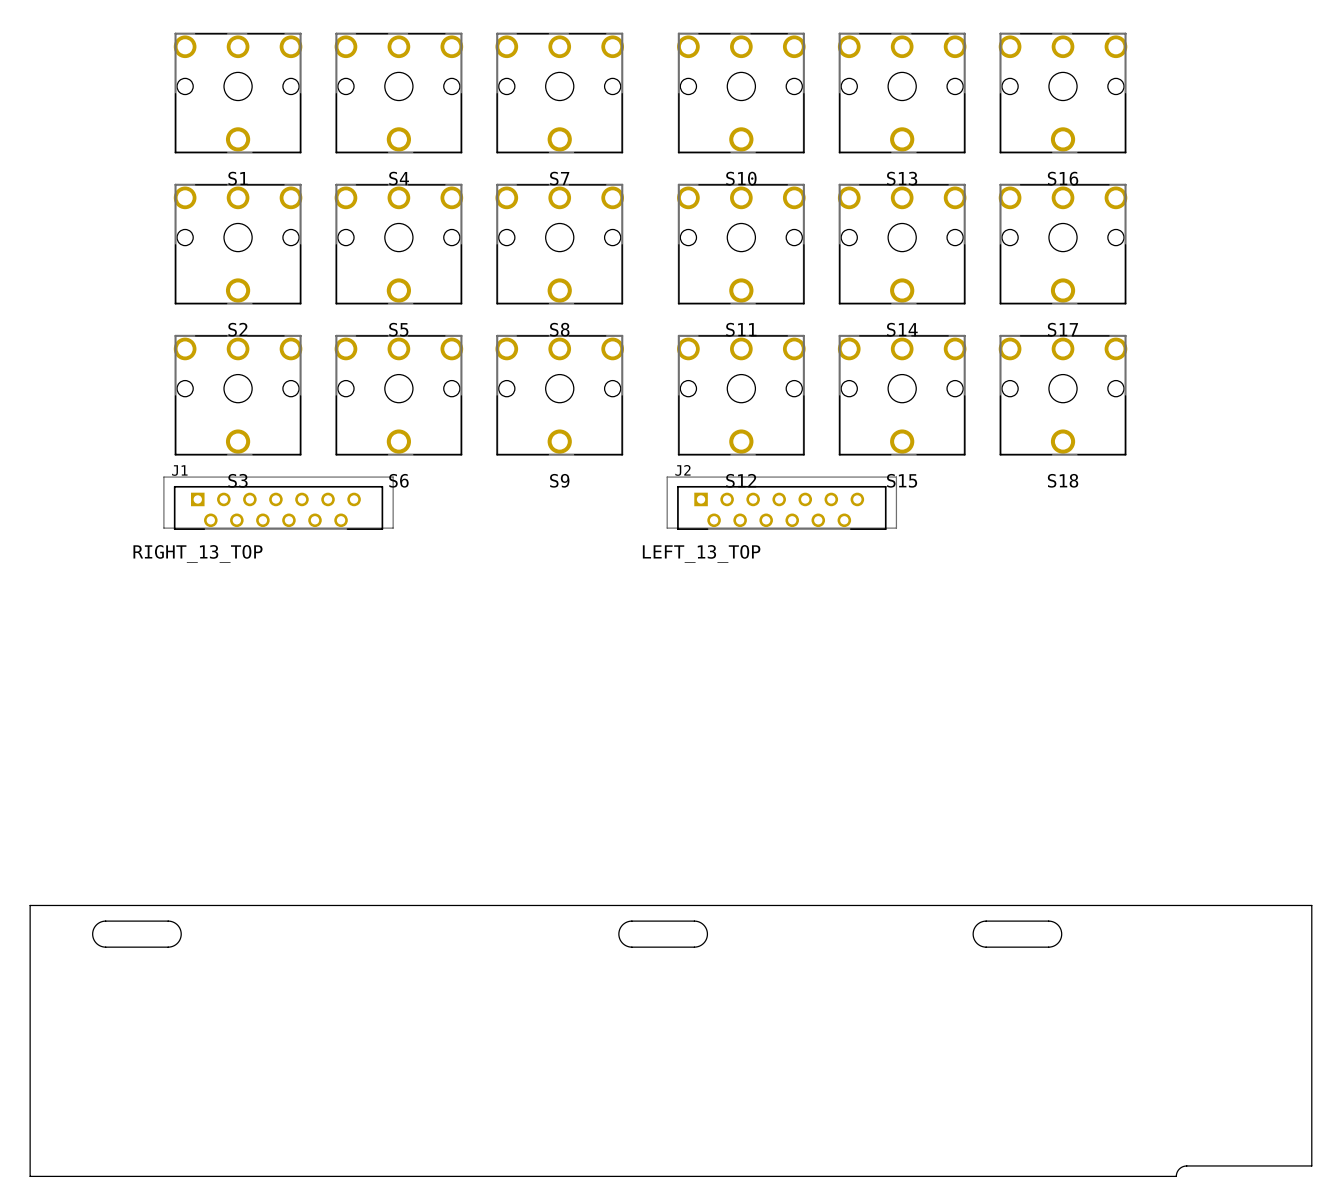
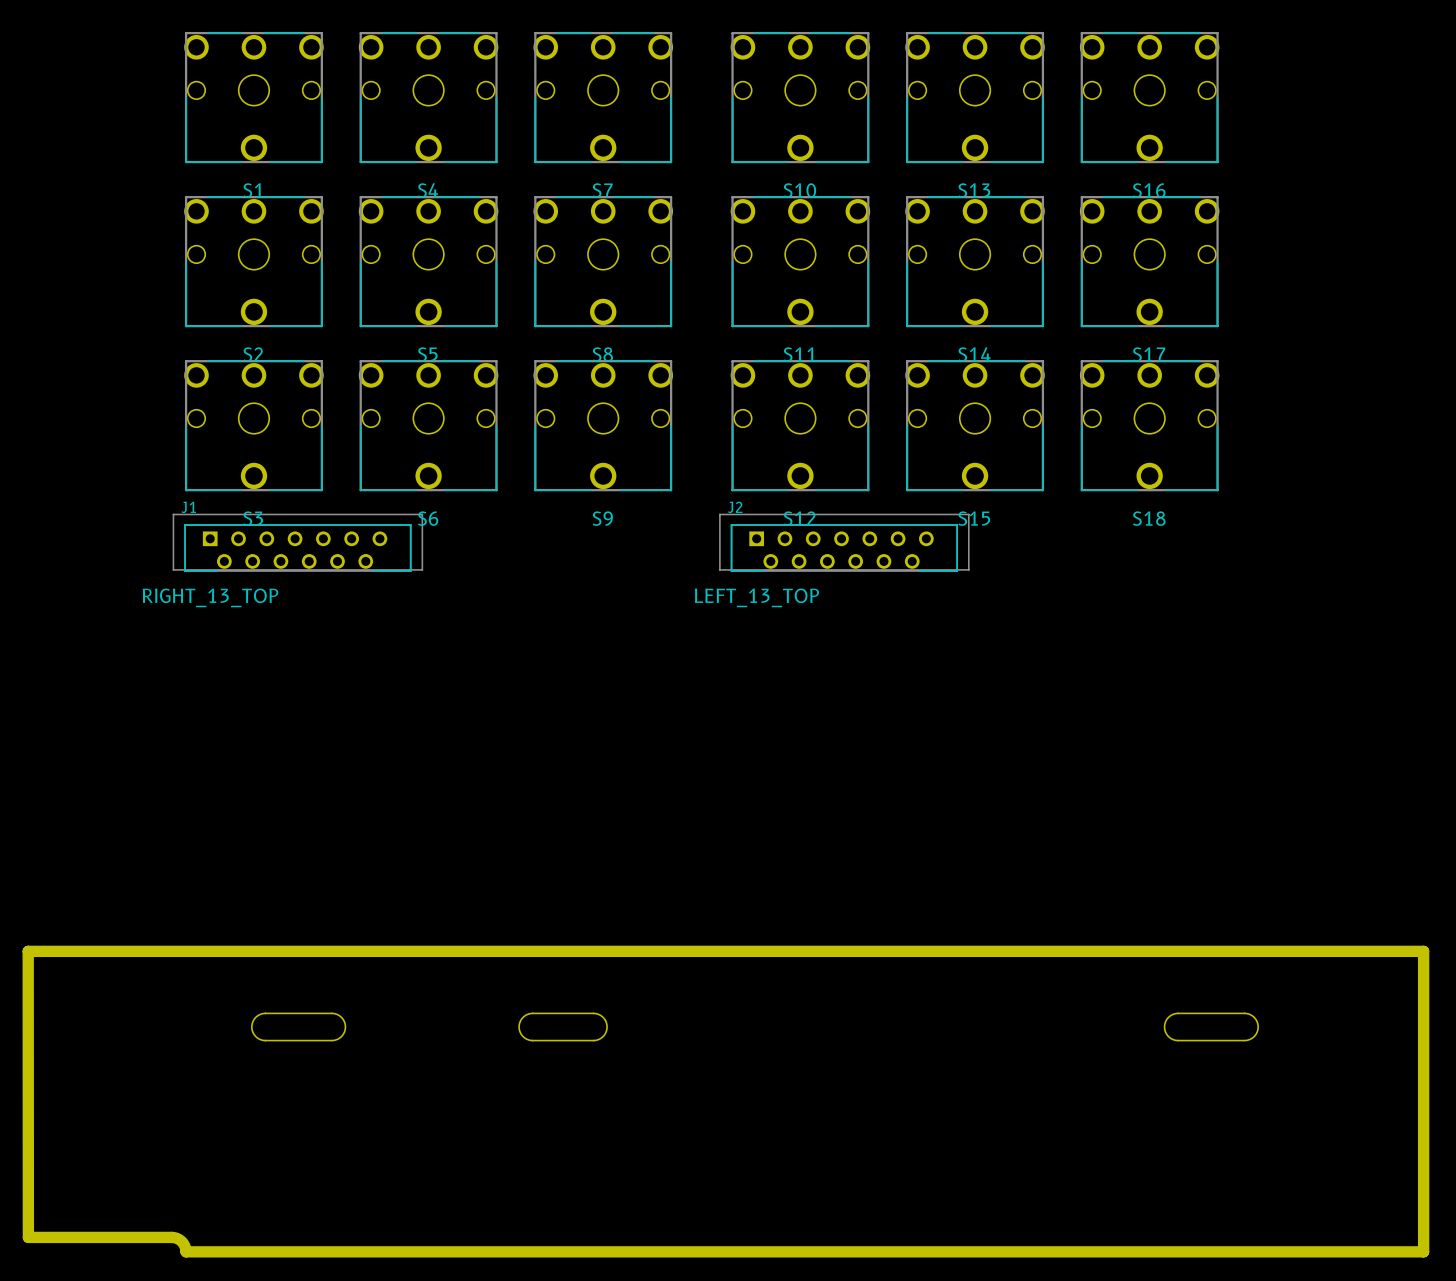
board edge: (30, 905) (1311, 905) (1311, 1165) (1185, 1166) (1179, 1169) (1176, 1176) (30, 1176) (30, 905) -> (28, 951) (28, 1237) (173, 1237) (183, 1243) (186, 1251) (1423, 1251) (1423, 951) (28, 951)
board edge: (105, 921) (171, 921) (179, 928) (180, 937) (176, 943) (169, 947) (102, 946) (94, 941) (92, 932) (97, 924) (105, 921) -> none
board edge: (631, 921) (697, 921) (705, 927) (706, 937) (703, 943) (696, 947) (628, 946) (621, 941) (618, 932) (623, 924) (631, 921) -> none
board edge: (986, 921) (1052, 921) (1059, 927) (1061, 937) (1056, 944) (1050, 947) (982, 946) (975, 942) (973, 932) (978, 923) (986, 921) -> none
board edge: none -> (532, 1013) (596, 1013) (604, 1019) (606, 1030) (602, 1037) (595, 1040) (529, 1040) (521, 1034) (519, 1025) (523, 1016) (532, 1013)
board edge: none -> (331, 1040) (262, 1040) (253, 1033) (252, 1023) (256, 1016) (263, 1013) (335, 1013) (343, 1019) (345, 1028) (340, 1037) (331, 1040)
board edge: none -> (1244, 1040) (1174, 1040) (1166, 1033) (1165, 1023) (1169, 1016) (1176, 1013) (1248, 1013) (1255, 1018) (1258, 1028) (1252, 1037) (1244, 1040)

